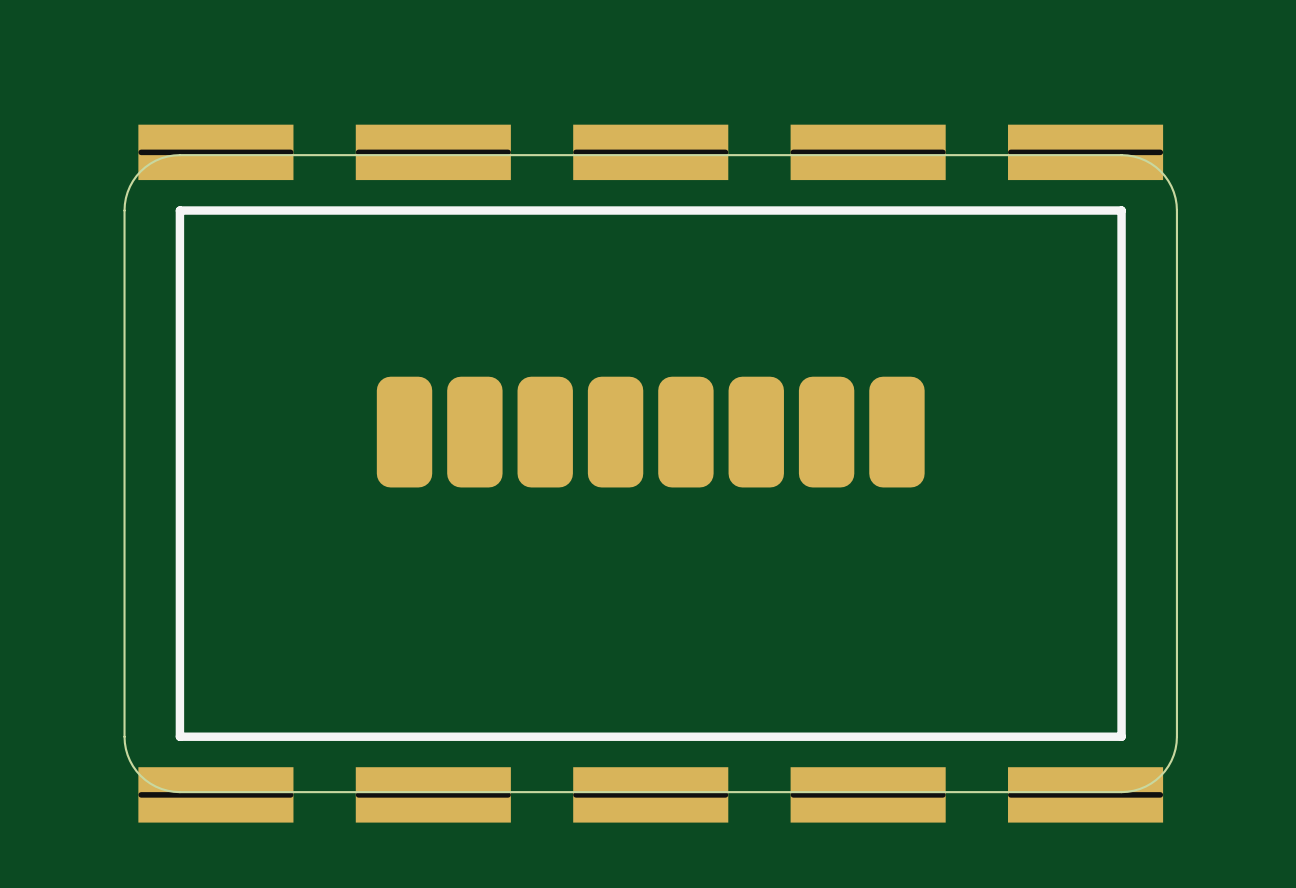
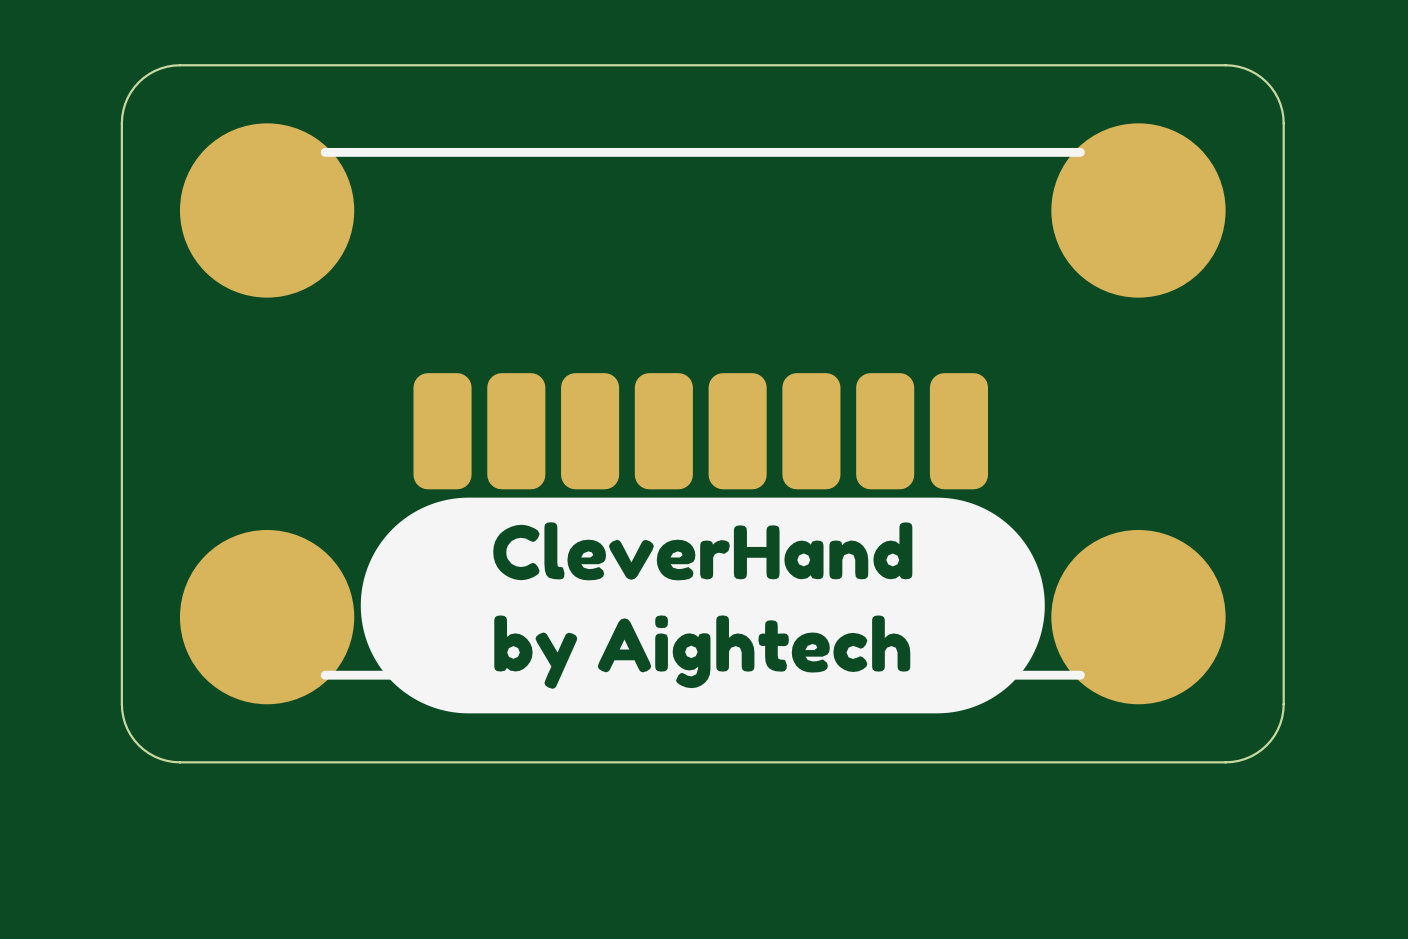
part: (215, 152) -> none
part: (433, 152) -> none
part: (650, 152) -> none
part: (868, 152) -> none
part: (1085, 152) -> none
board edge: (179, 155) (1121, 155) (1139, 158) (1151, 163) (1160, 171) (1171, 186) (1176, 210) (1176, 736) (1175, 749) (1168, 766) (1151, 783) (1139, 789) (1121, 792) (179, 792) (167, 790) (150, 783) (133, 766) (127, 755) (124, 736) (124, 210) (127, 192) (140, 171) (161, 158) (179, 155) -> (179, 65) (154, 71) (138, 82) (127, 98) (121, 123) (121, 704) (127, 729) (138, 745) (149, 753) (160, 759) (179, 762) (1225, 762) (1250, 756) (1266, 745) (1274, 735) (1280, 723) (1283, 704) (1283, 123) (1277, 98) (1266, 82) (1256, 74) (1244, 68) (1225, 65) (179, 65)
line: none -> (325, 152) (1080, 152)
line: (179, 210) (1121, 210) (1121, 736) (179, 736) (179, 210) -> none
part: none -> (267, 210)
part: none -> (1138, 210)
drawing: none -> [360, 497, 1045, 714]
part: none -> (267, 617)
part: none -> (1138, 617)
line: none -> (325, 675) (394, 675)
line: none -> (1010, 675) (1080, 675)
part: (215, 794) -> none
part: (433, 794) -> none
part: (650, 794) -> none
part: (868, 794) -> none
part: (1085, 794) -> none

